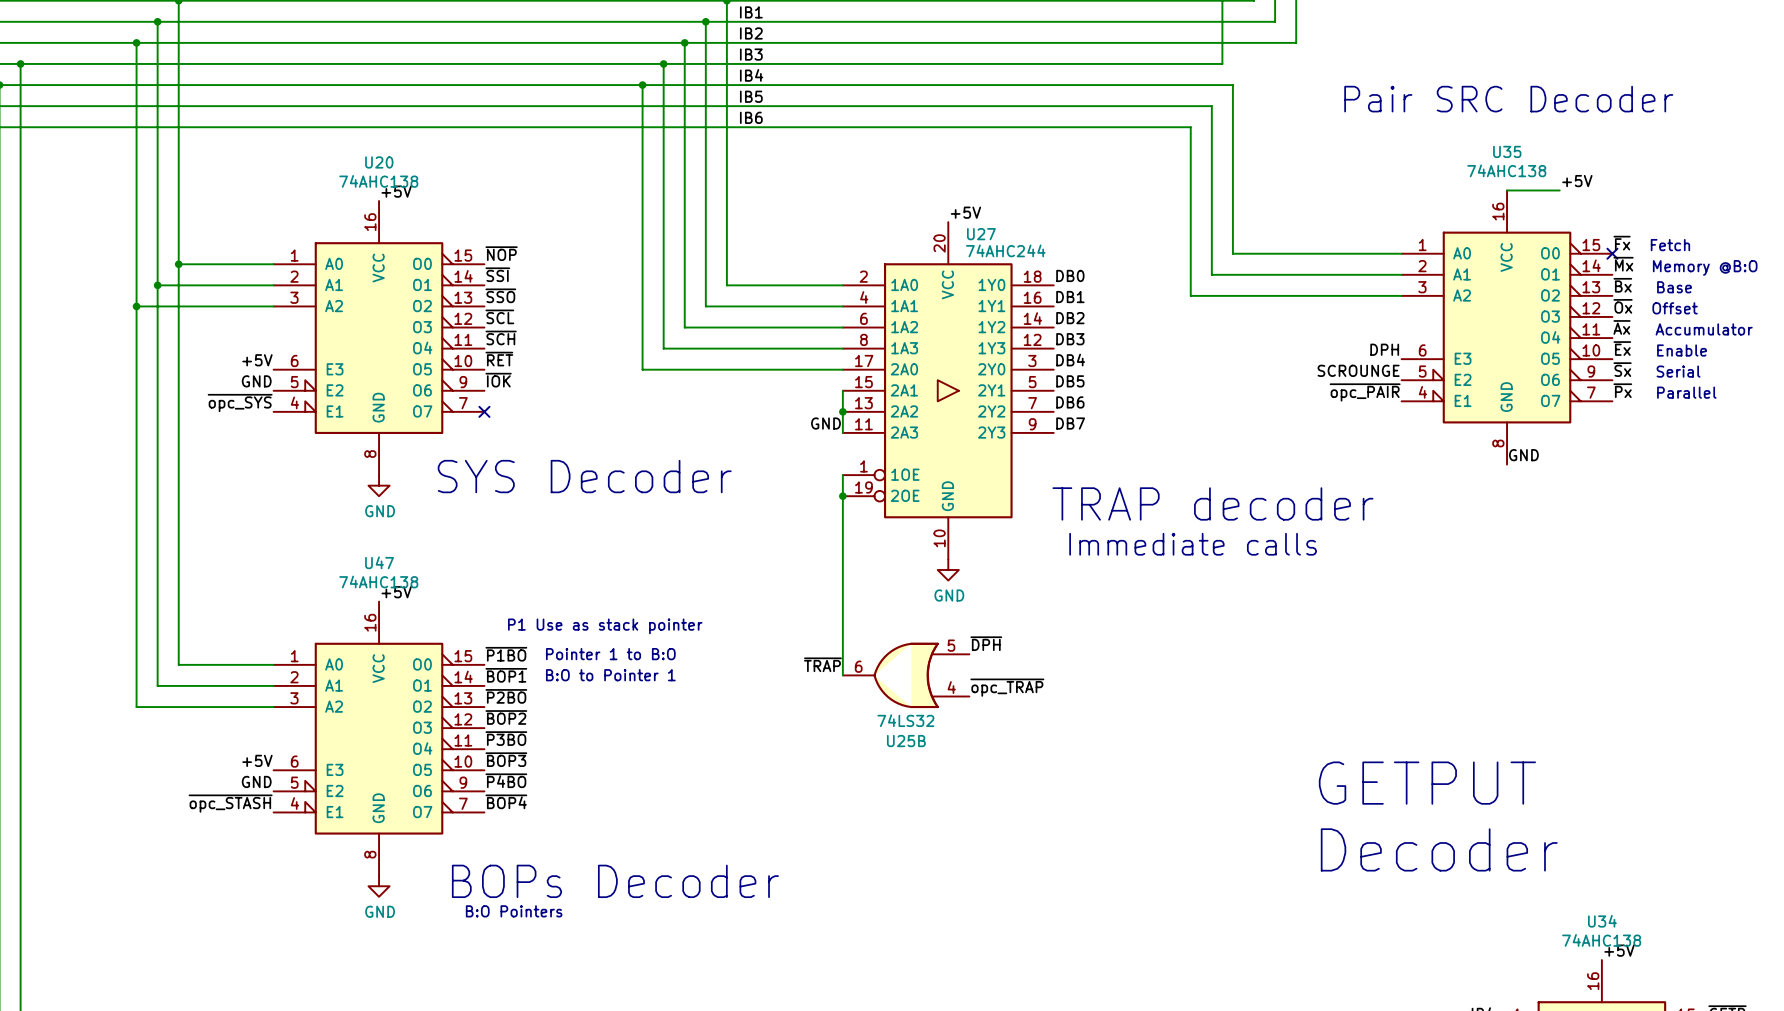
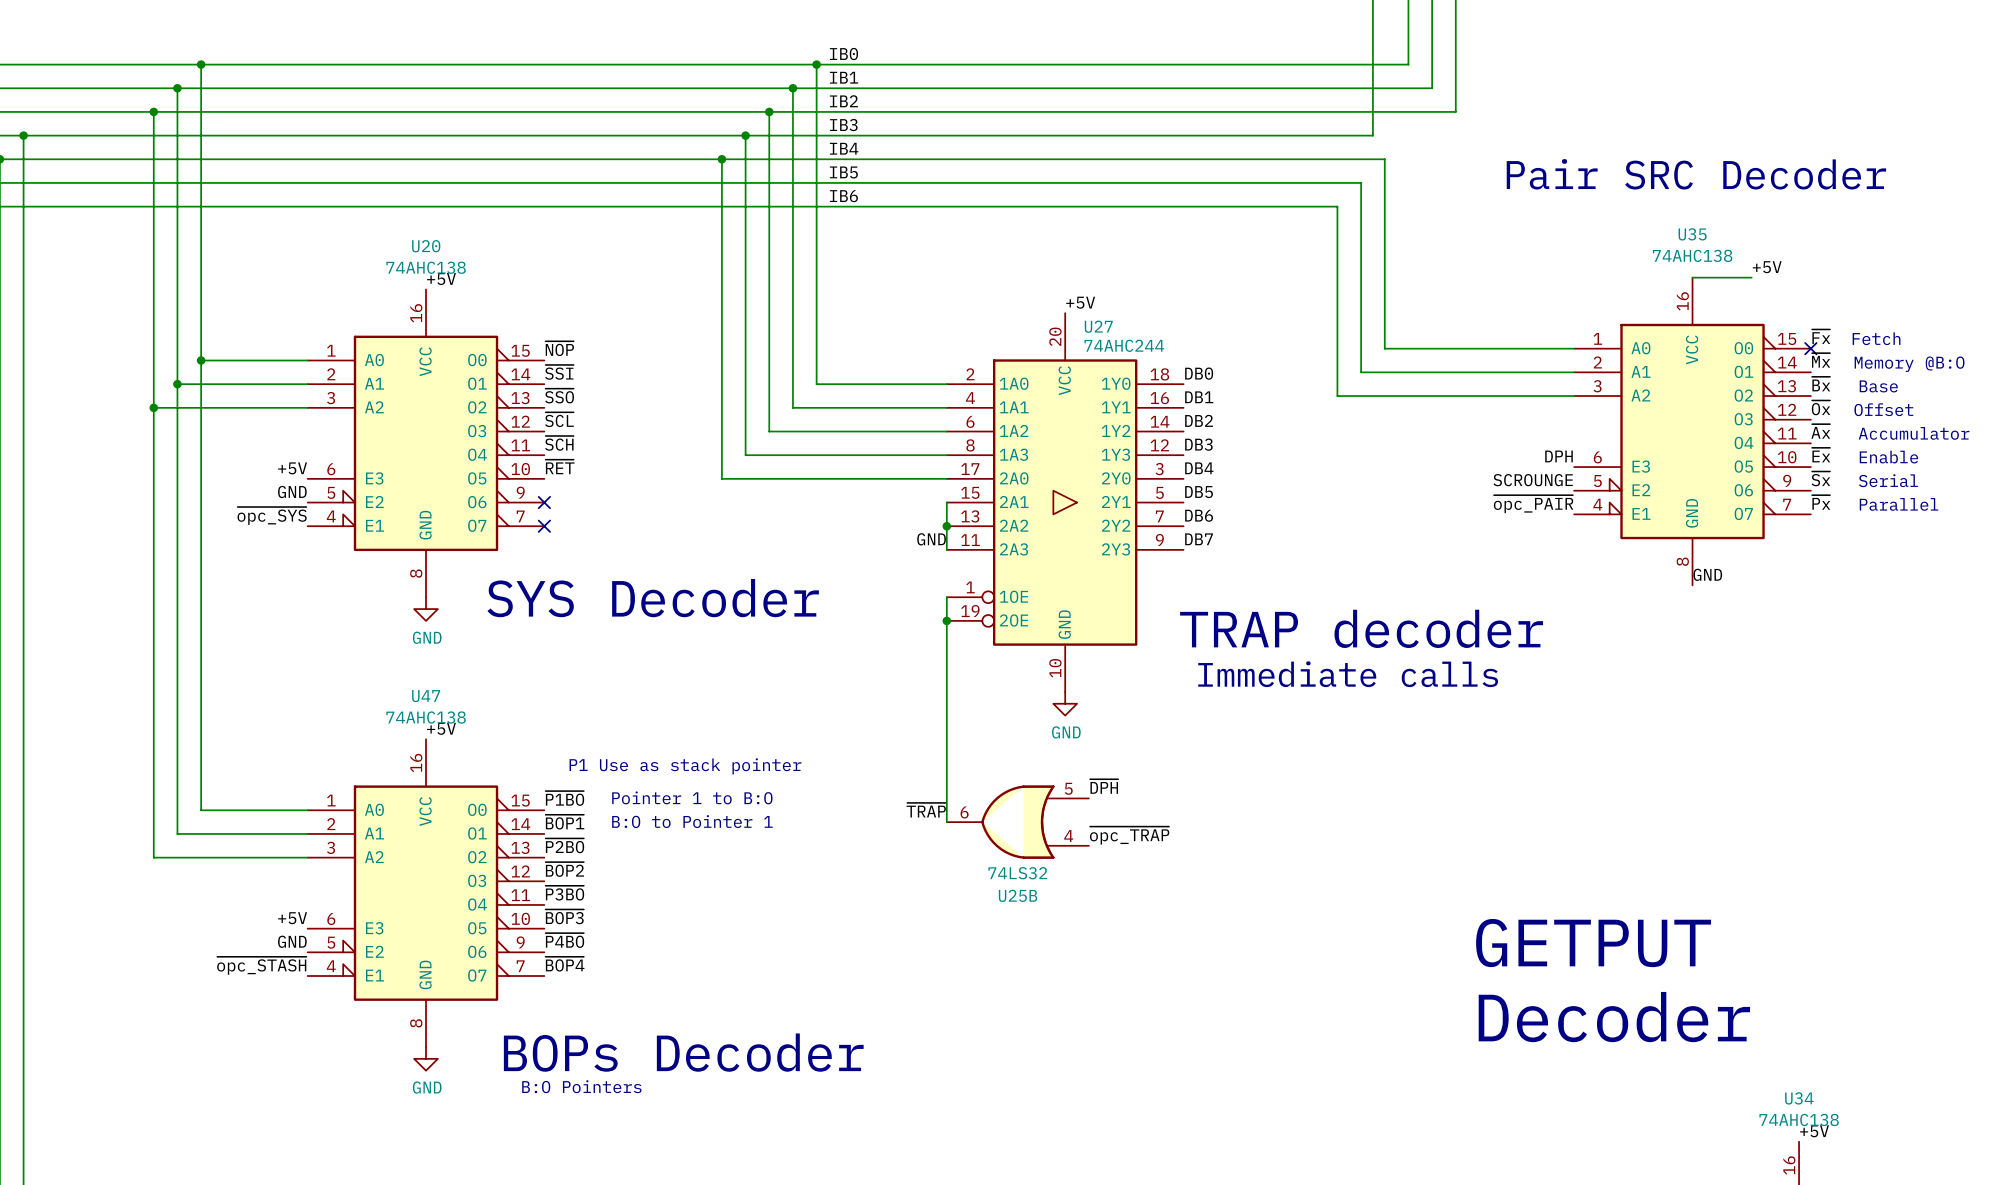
label: ~{IOK} (498, 380) -> none
no-connect mark: none -> (544, 502)

